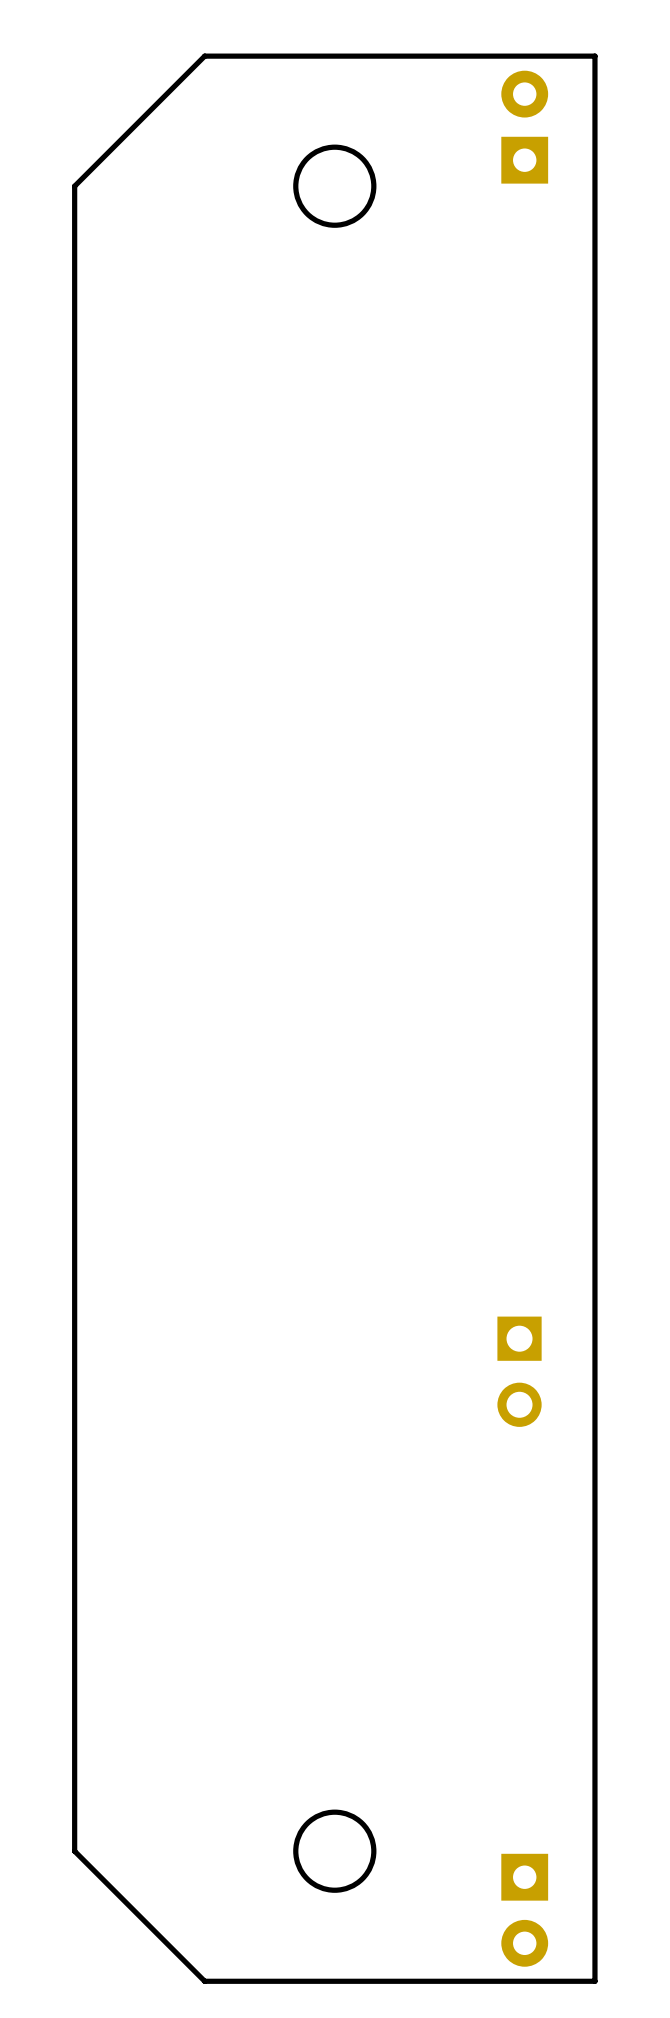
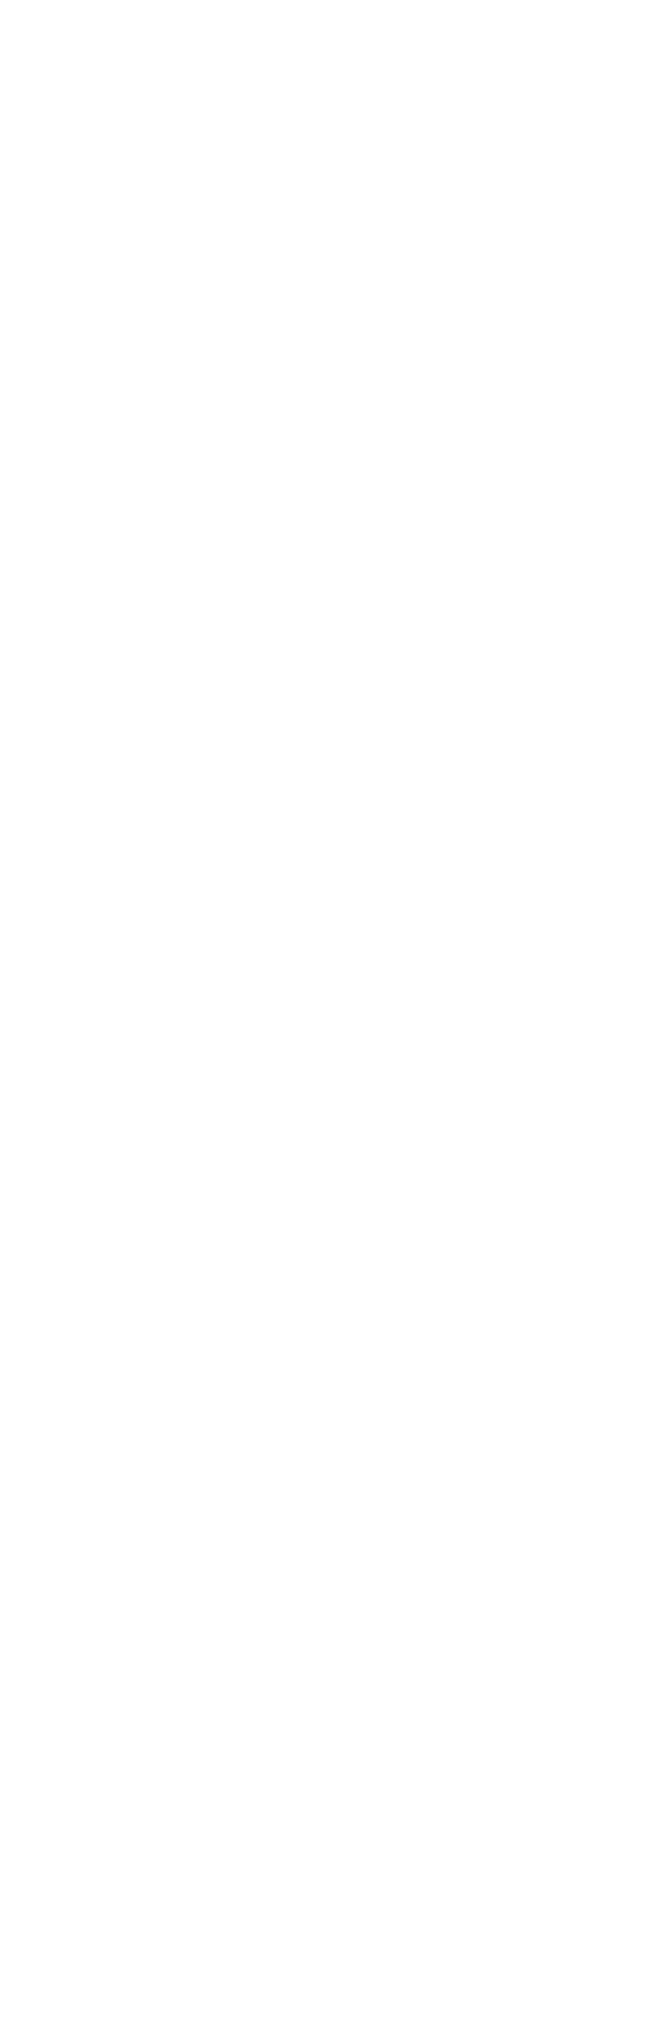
board edge: (594, 56) (594, 1981) (204, 1981) (74, 1851) (74, 186) (204, 56) (594, 56) -> none
part: (524, 127) -> none
round board edge: [293, 144, 377, 228] -> none
part: (519, 1371) -> none
round board edge: [293, 1809, 377, 1893] -> none
part: (524, 1910) -> none

